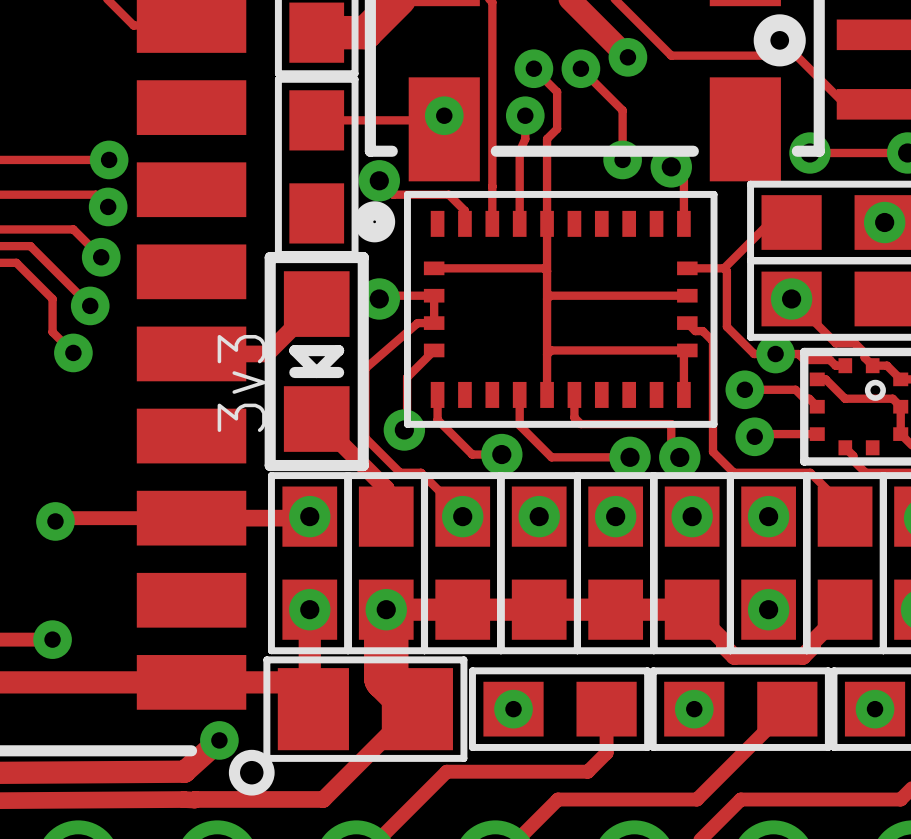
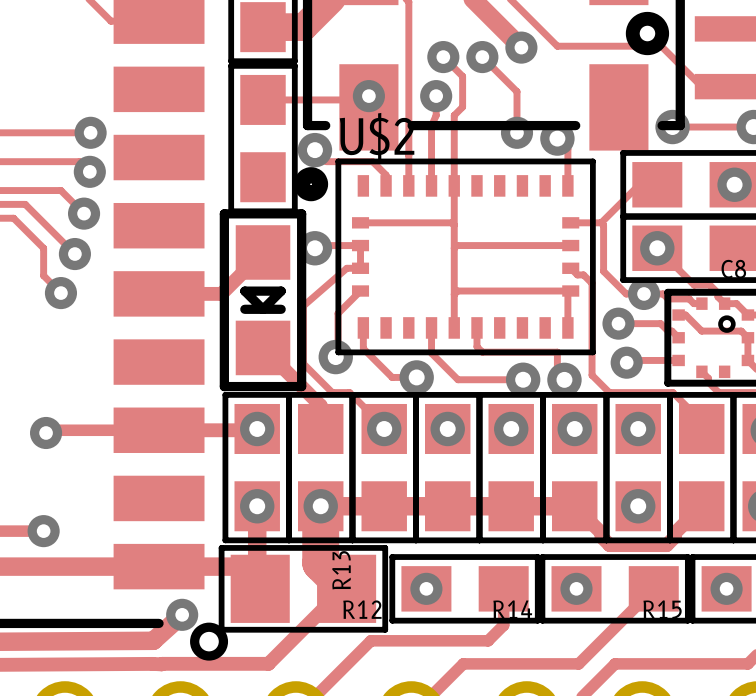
U$2 name: none -> U$2 (377, 136)
C8 name: none -> C8 (733, 269)
text: 3v3 (241, 383) -> none
R13 name: none -> R13 (341, 570)
R14 name: none -> R14 (512, 609)
R12 name: none -> R12 (362, 609)
R15 name: none -> R15 (662, 609)

